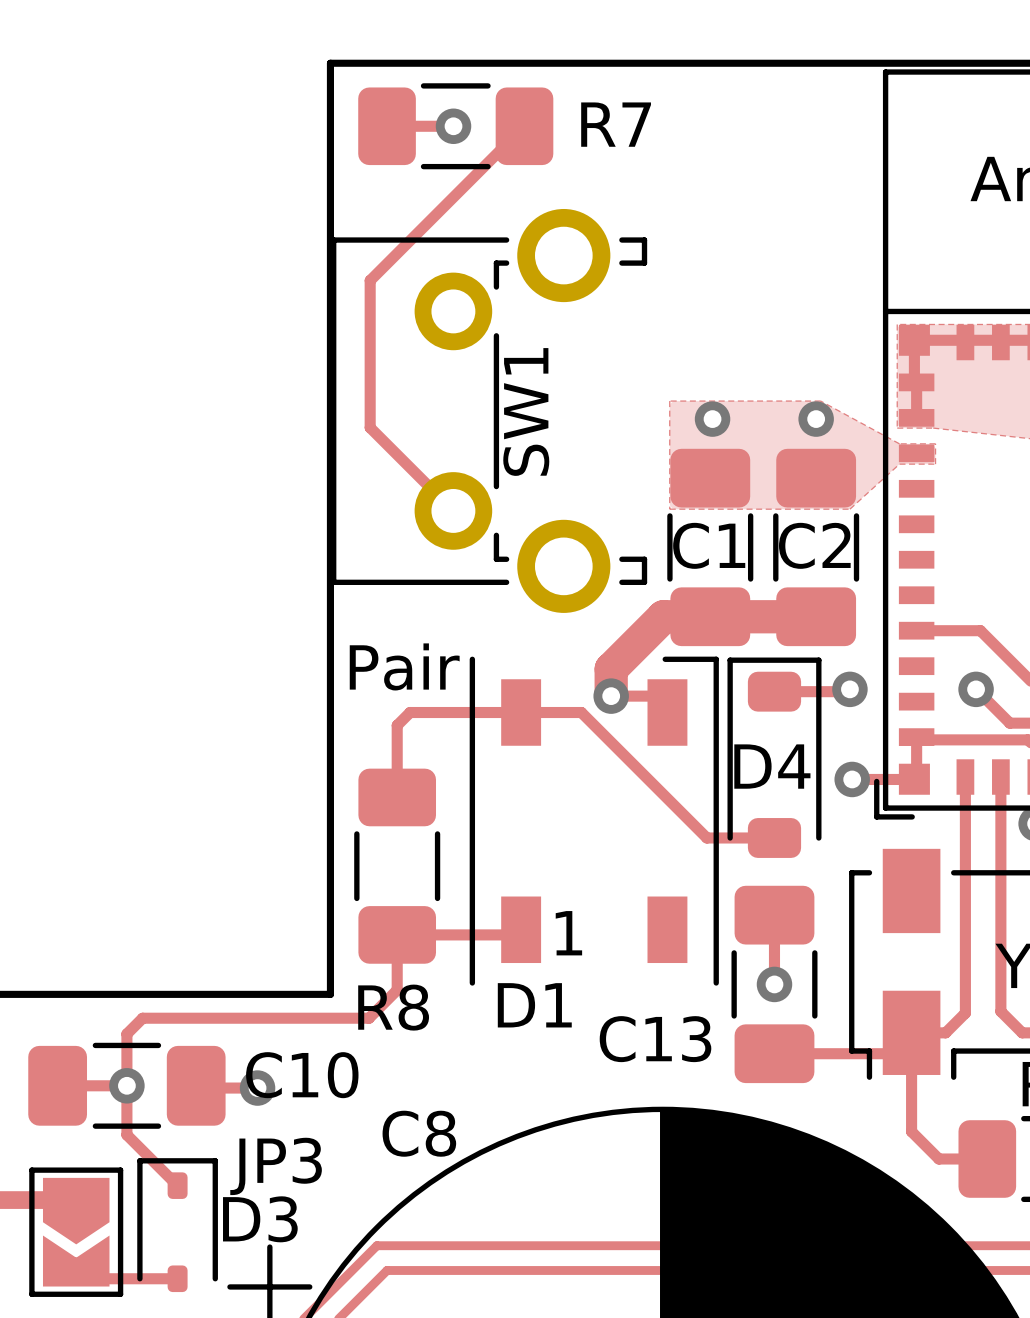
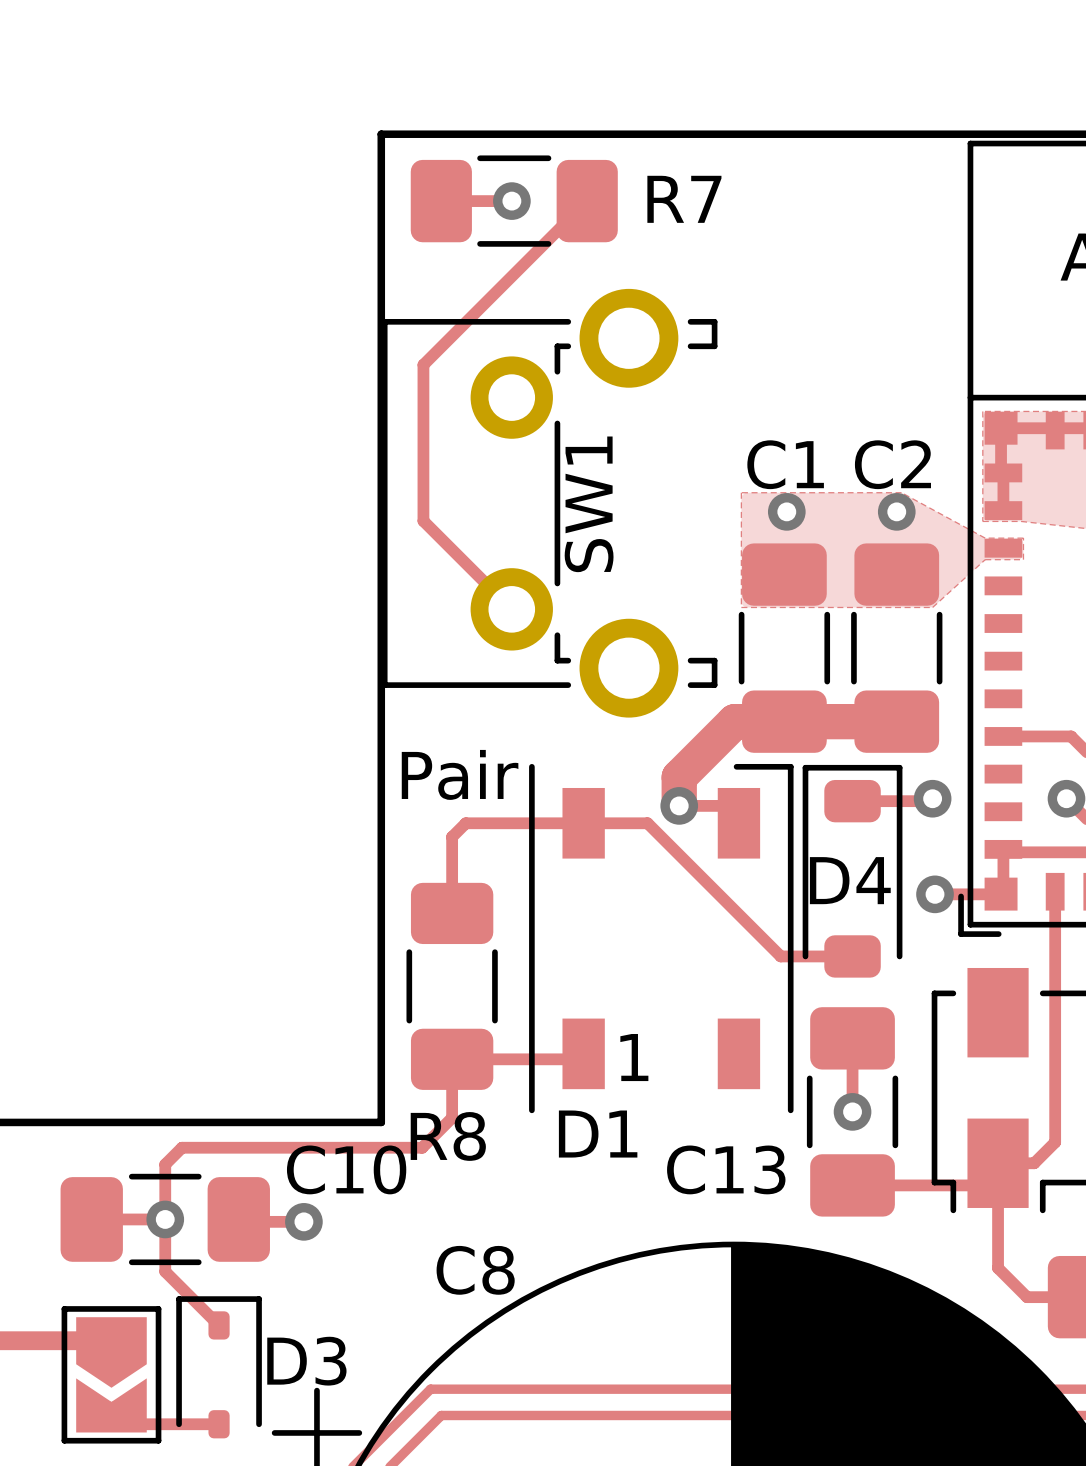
C1 name position: C1 (709, 545) -> C1 (785, 464)
C2 name position: C2 (814, 545) -> C2 (892, 464)
C10 name position: C10 (302, 1075) -> C10 (346, 1169)
JP3 name: JP3 (276, 1166) -> none

